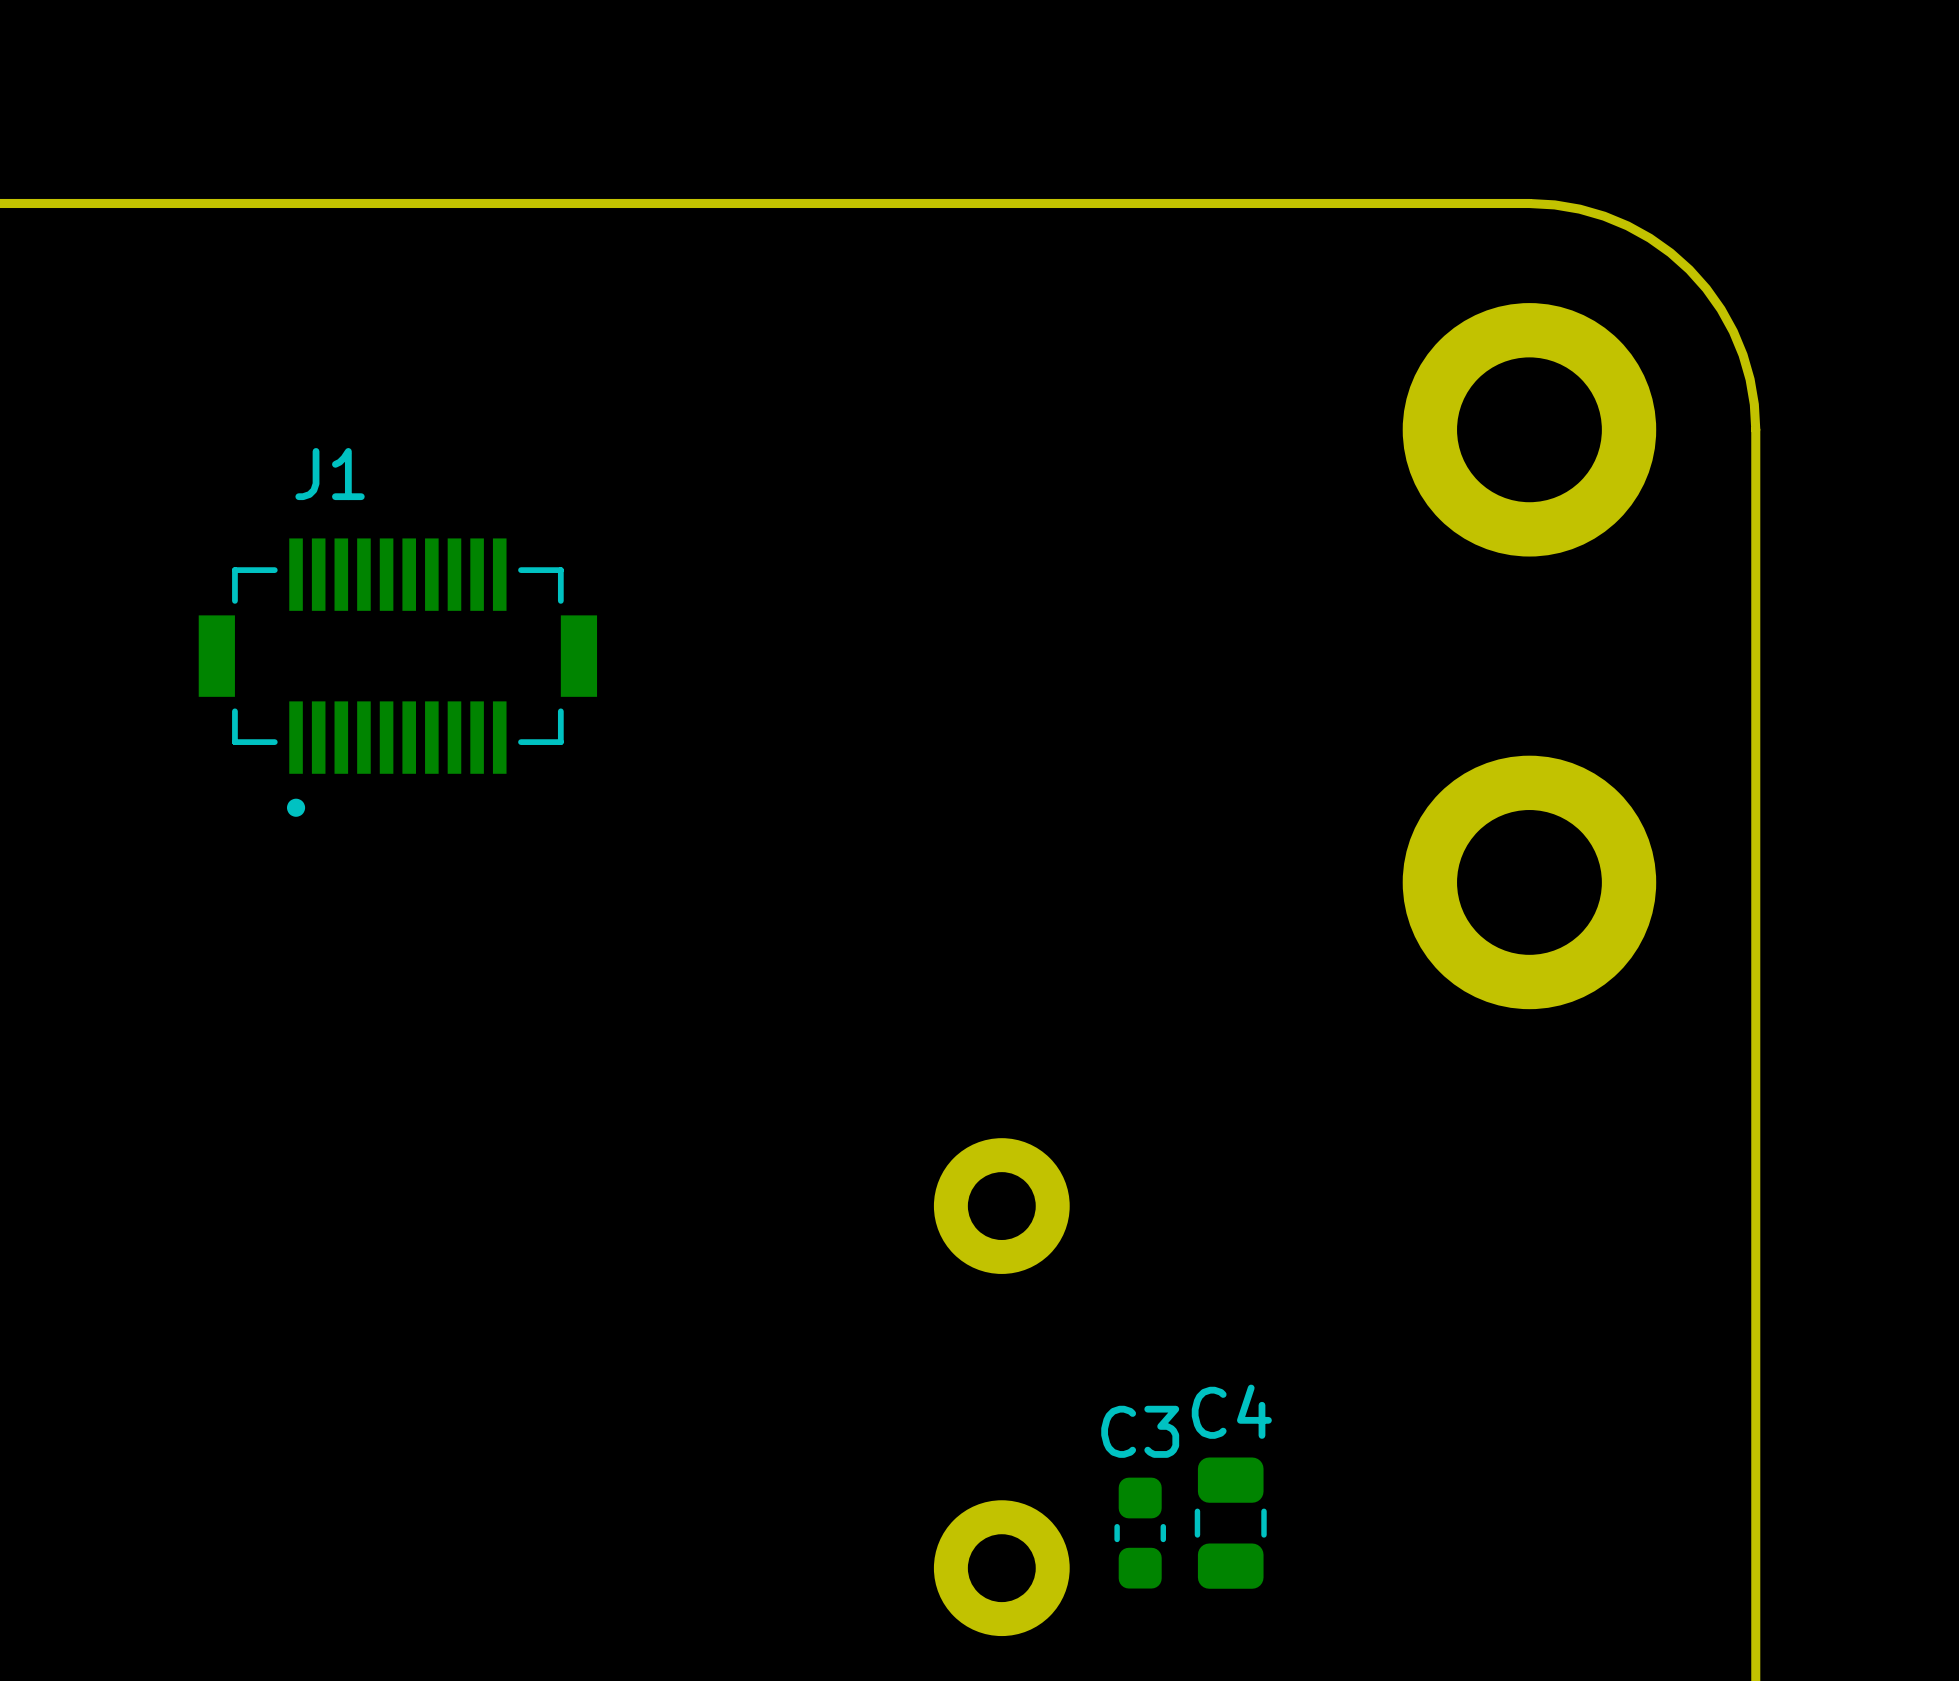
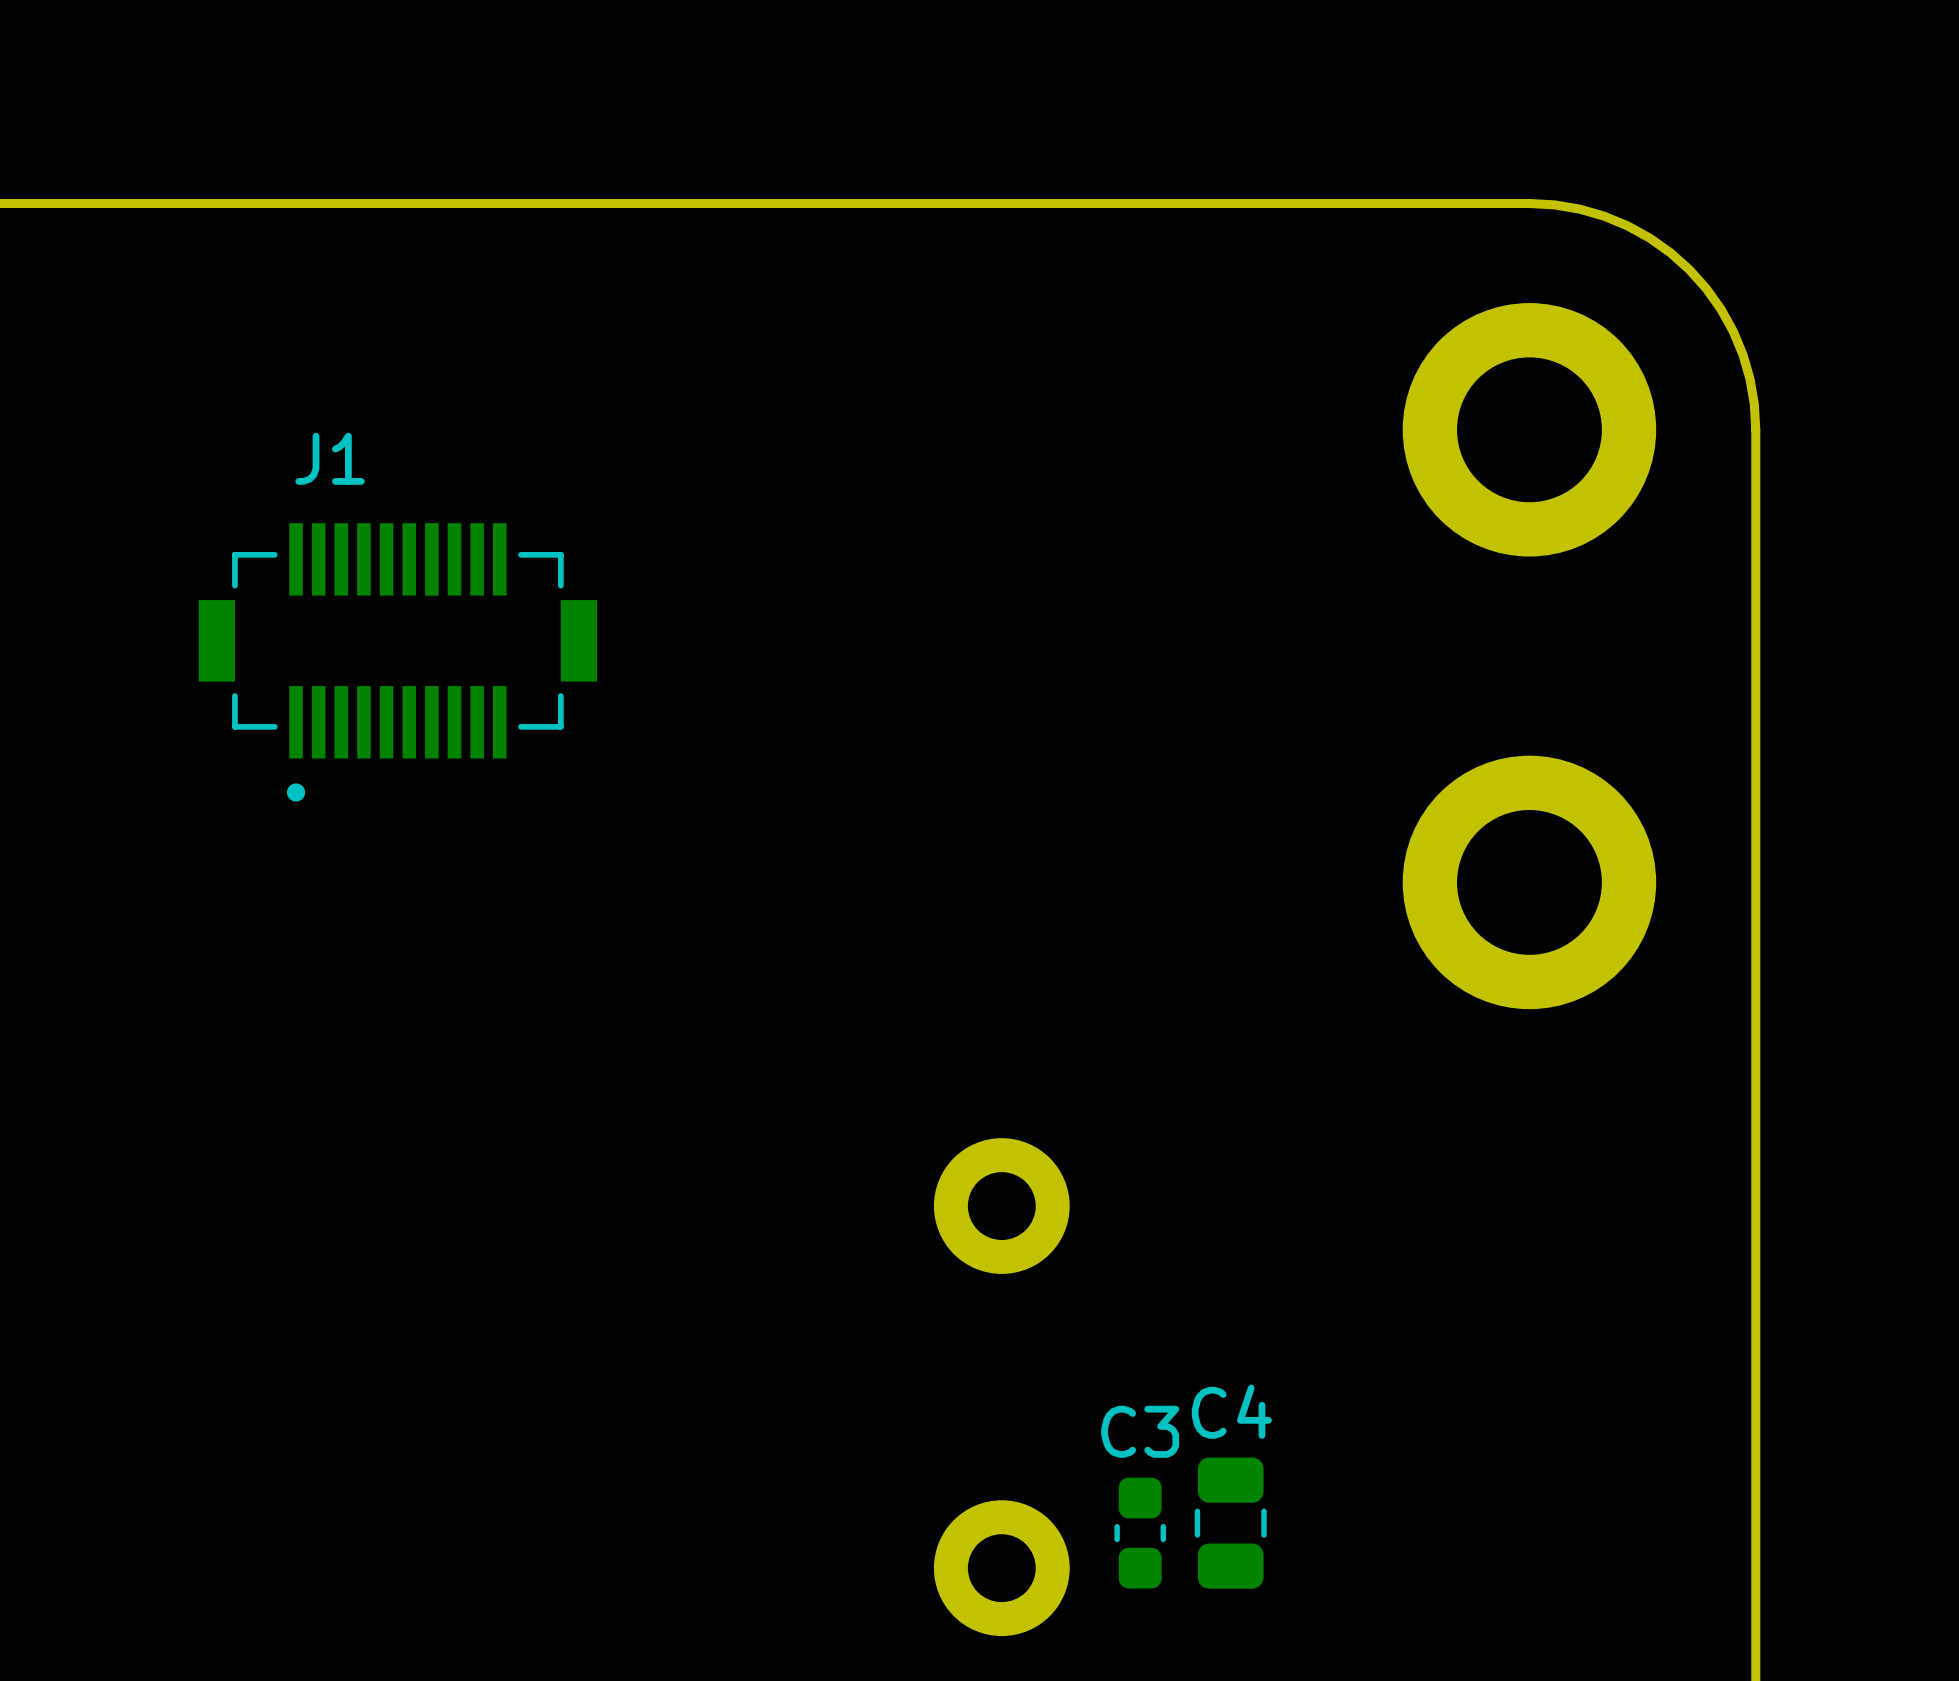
J1 position: (397, 677) -> (397, 662)

